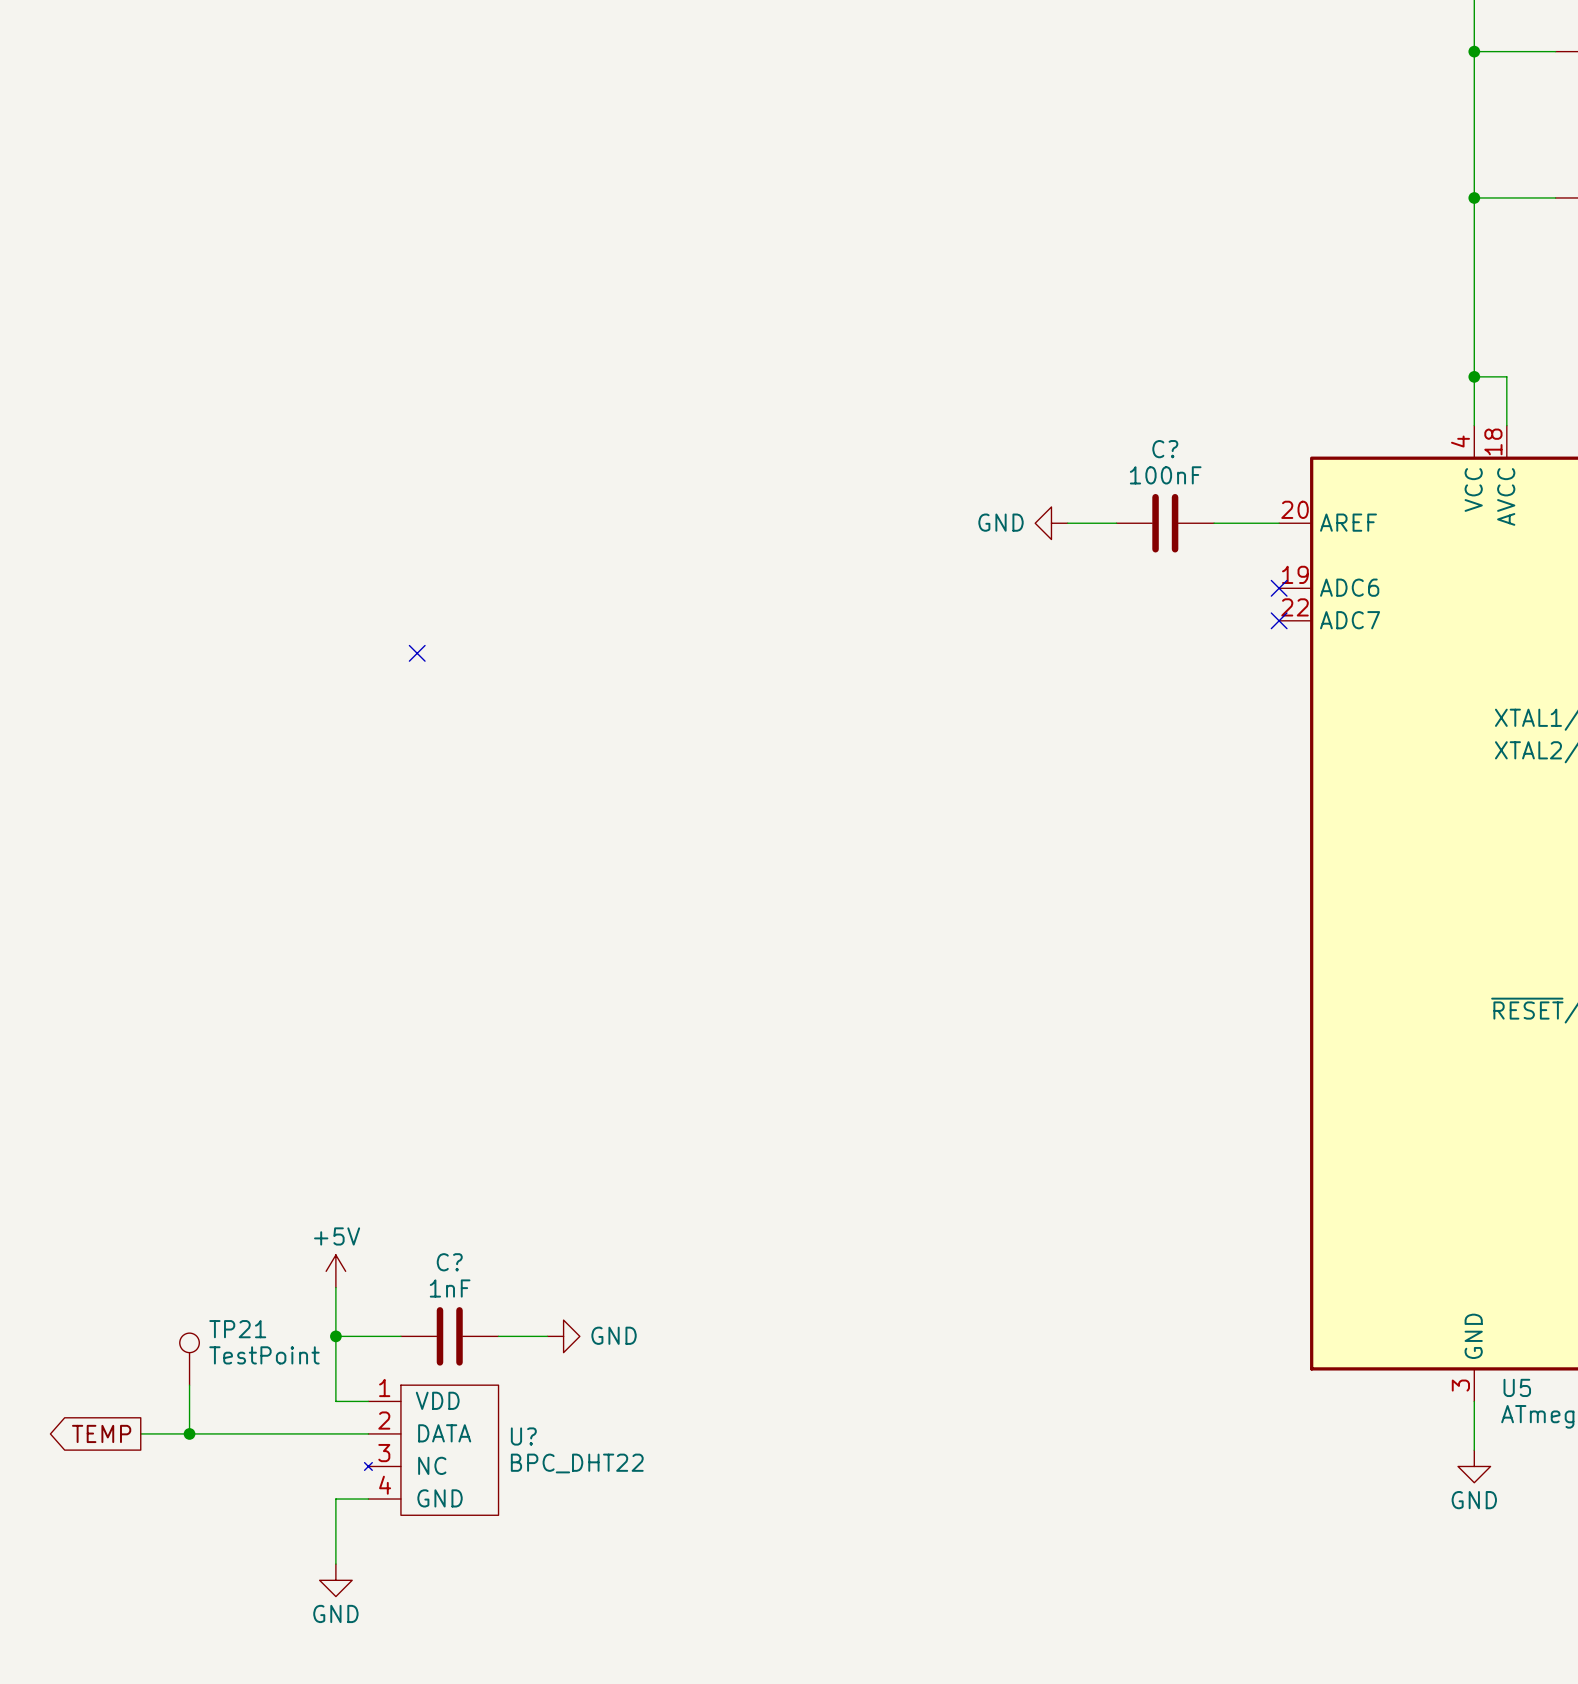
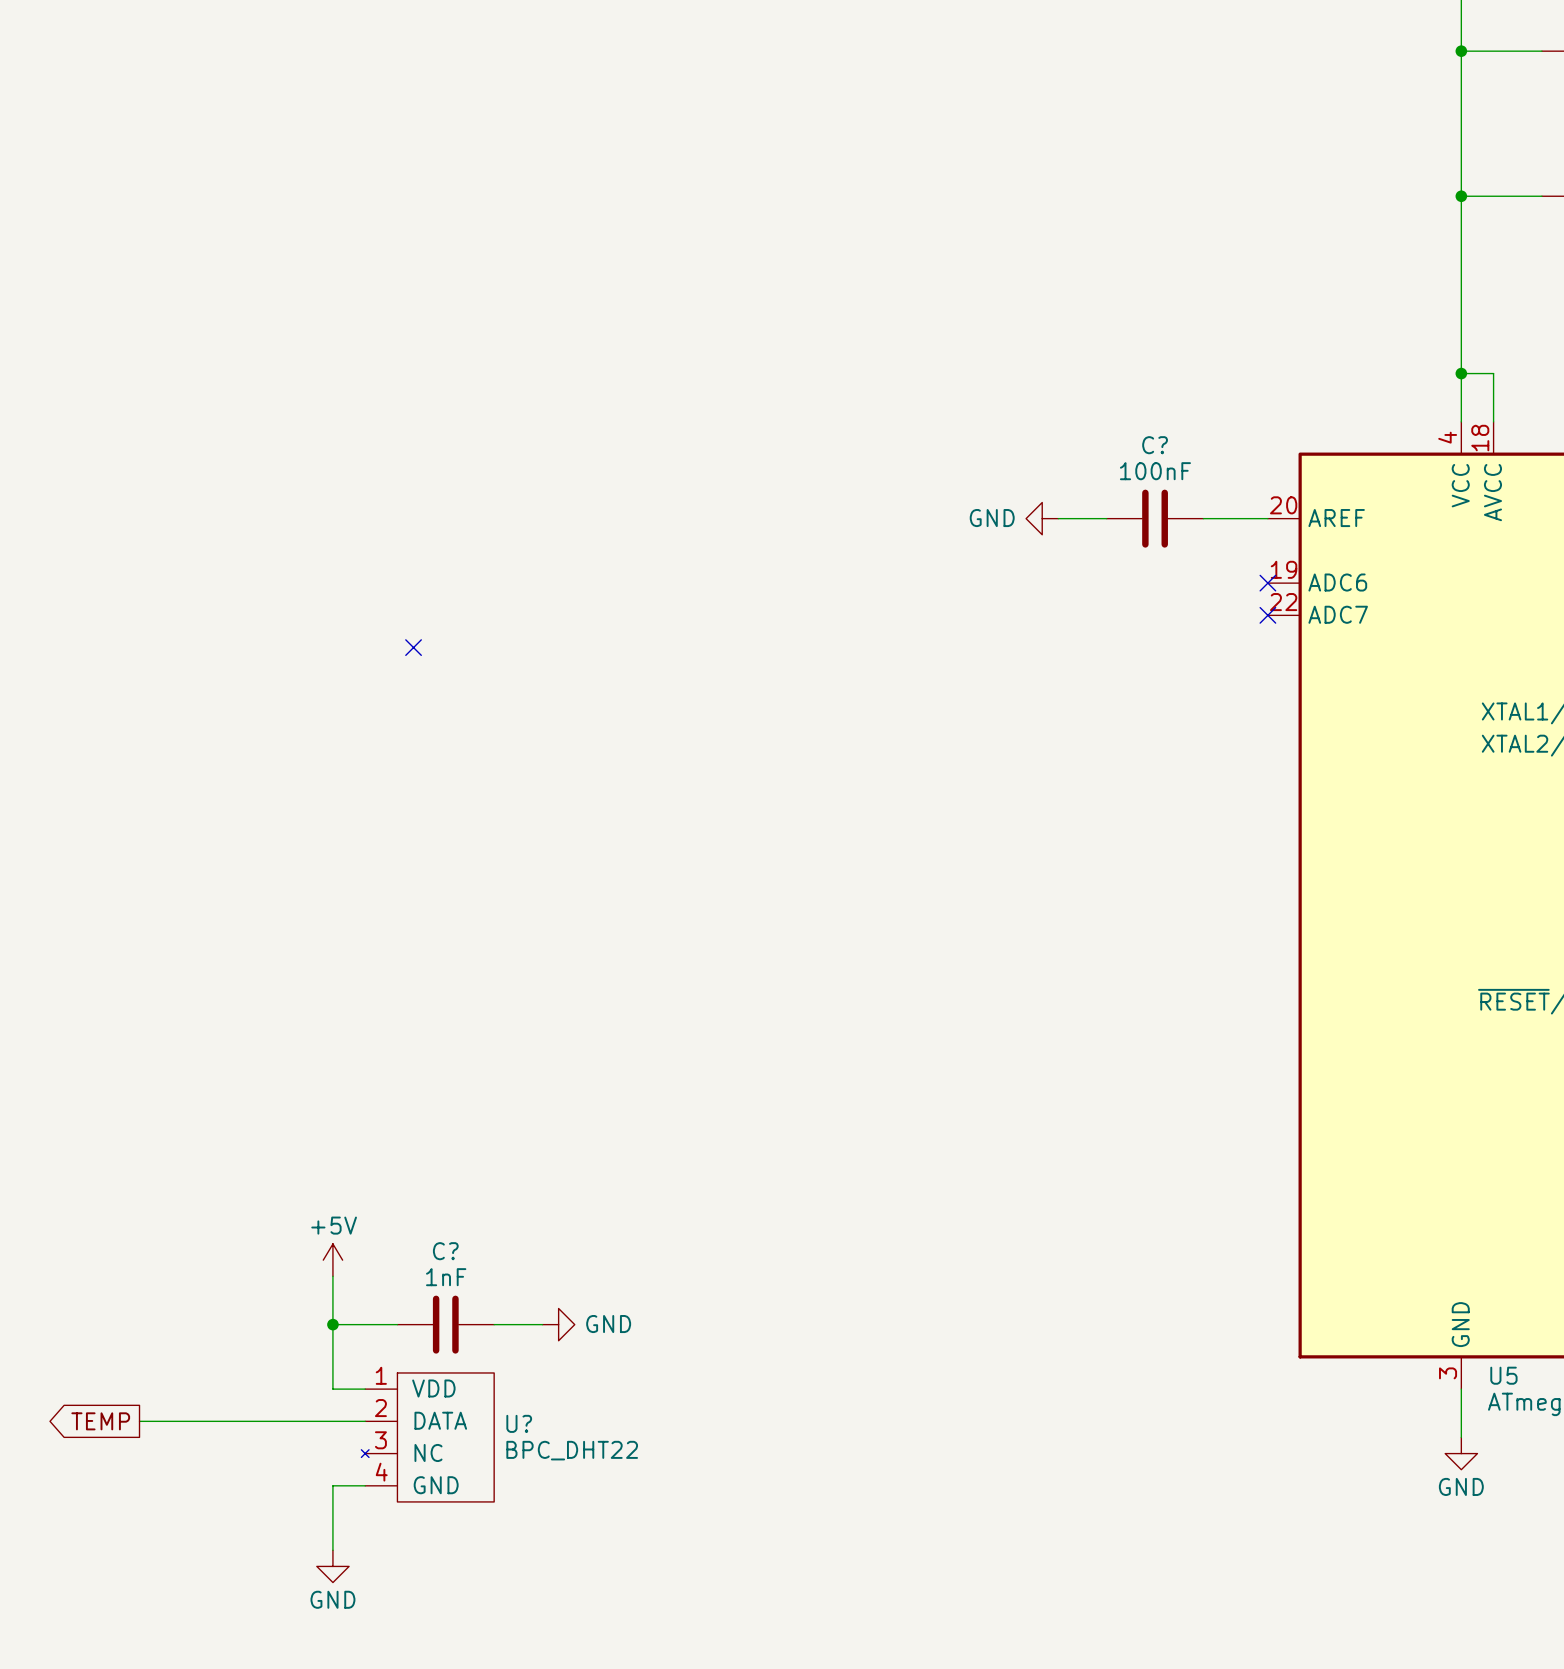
TP21: TestPoint (189, 1359) -> none
wire: (189, 1385) (189, 1433) -> none
junction: (189, 1433) -> none

